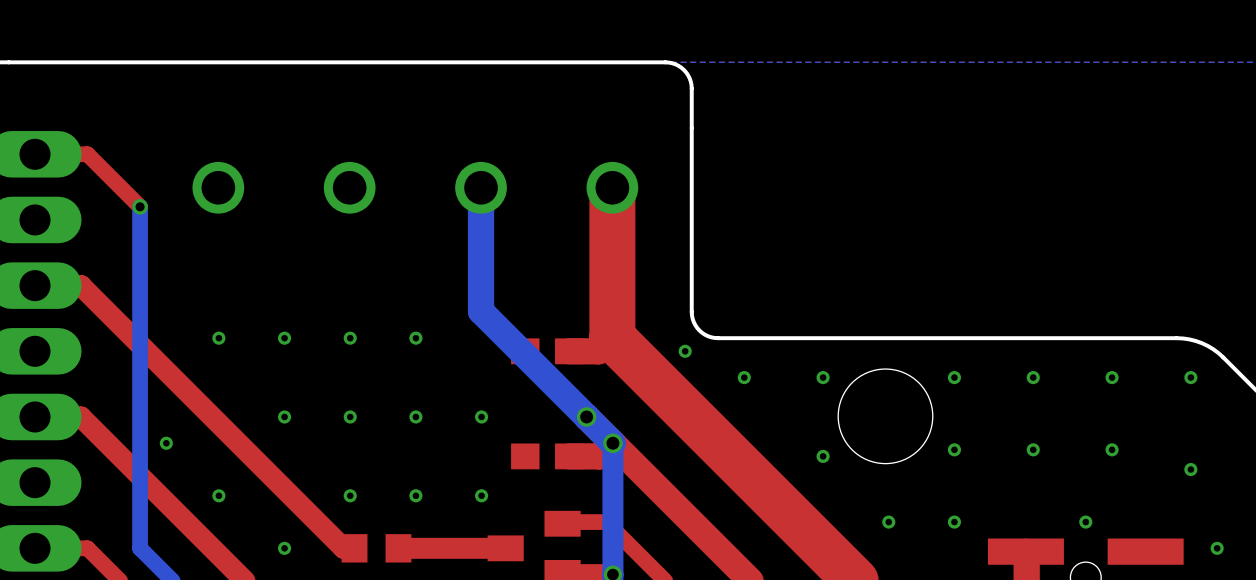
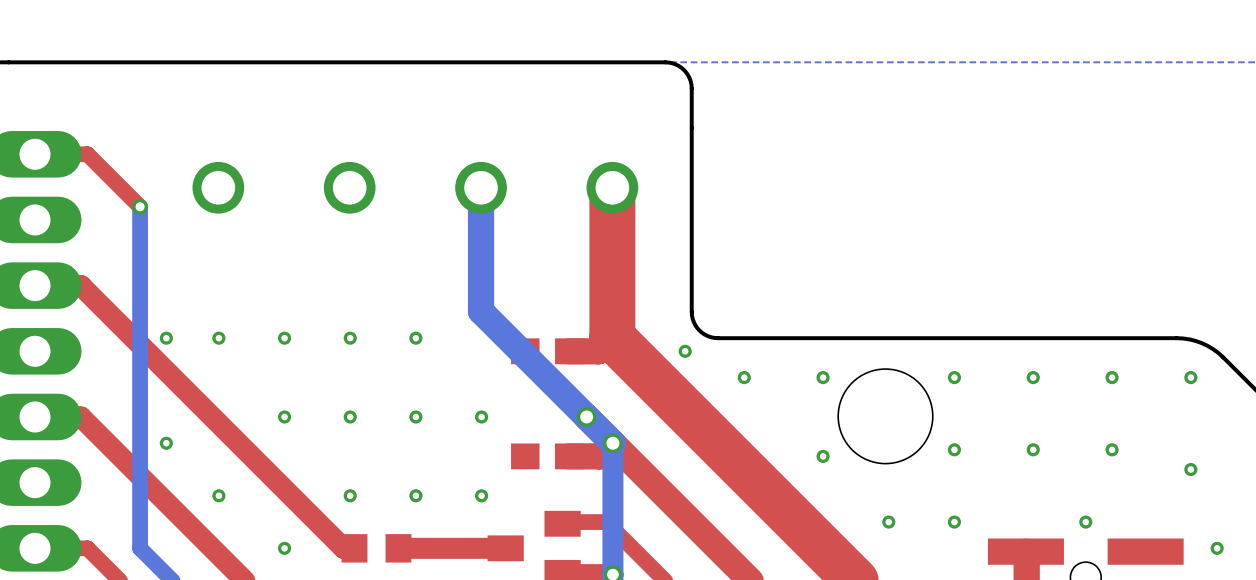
via: none -> (166, 338)

